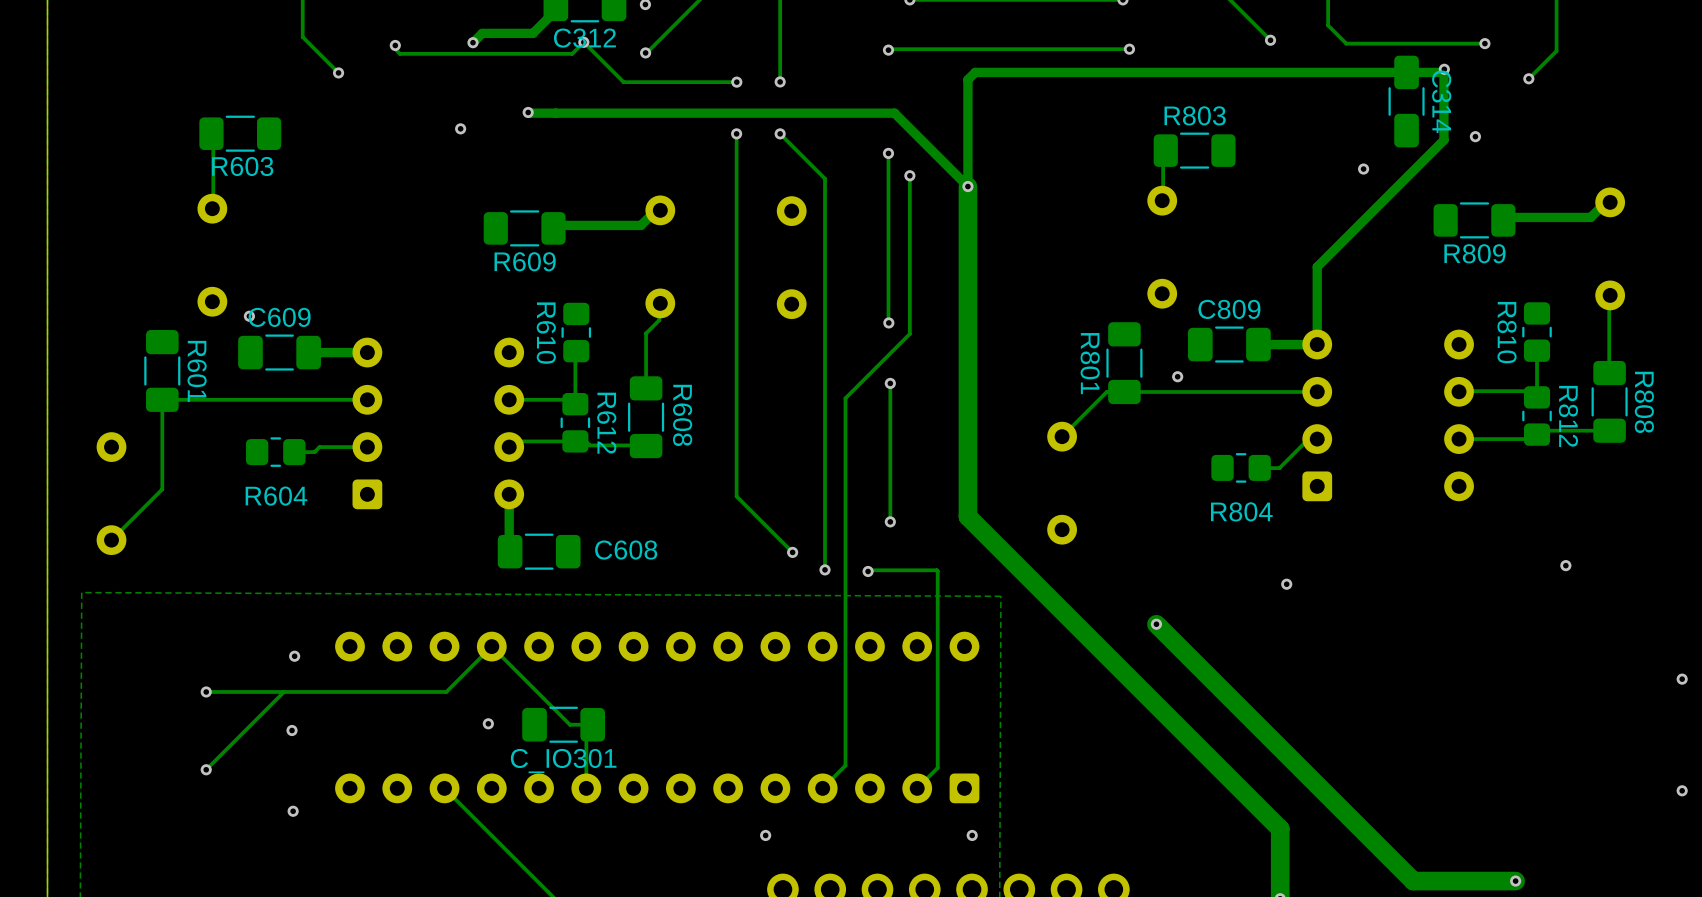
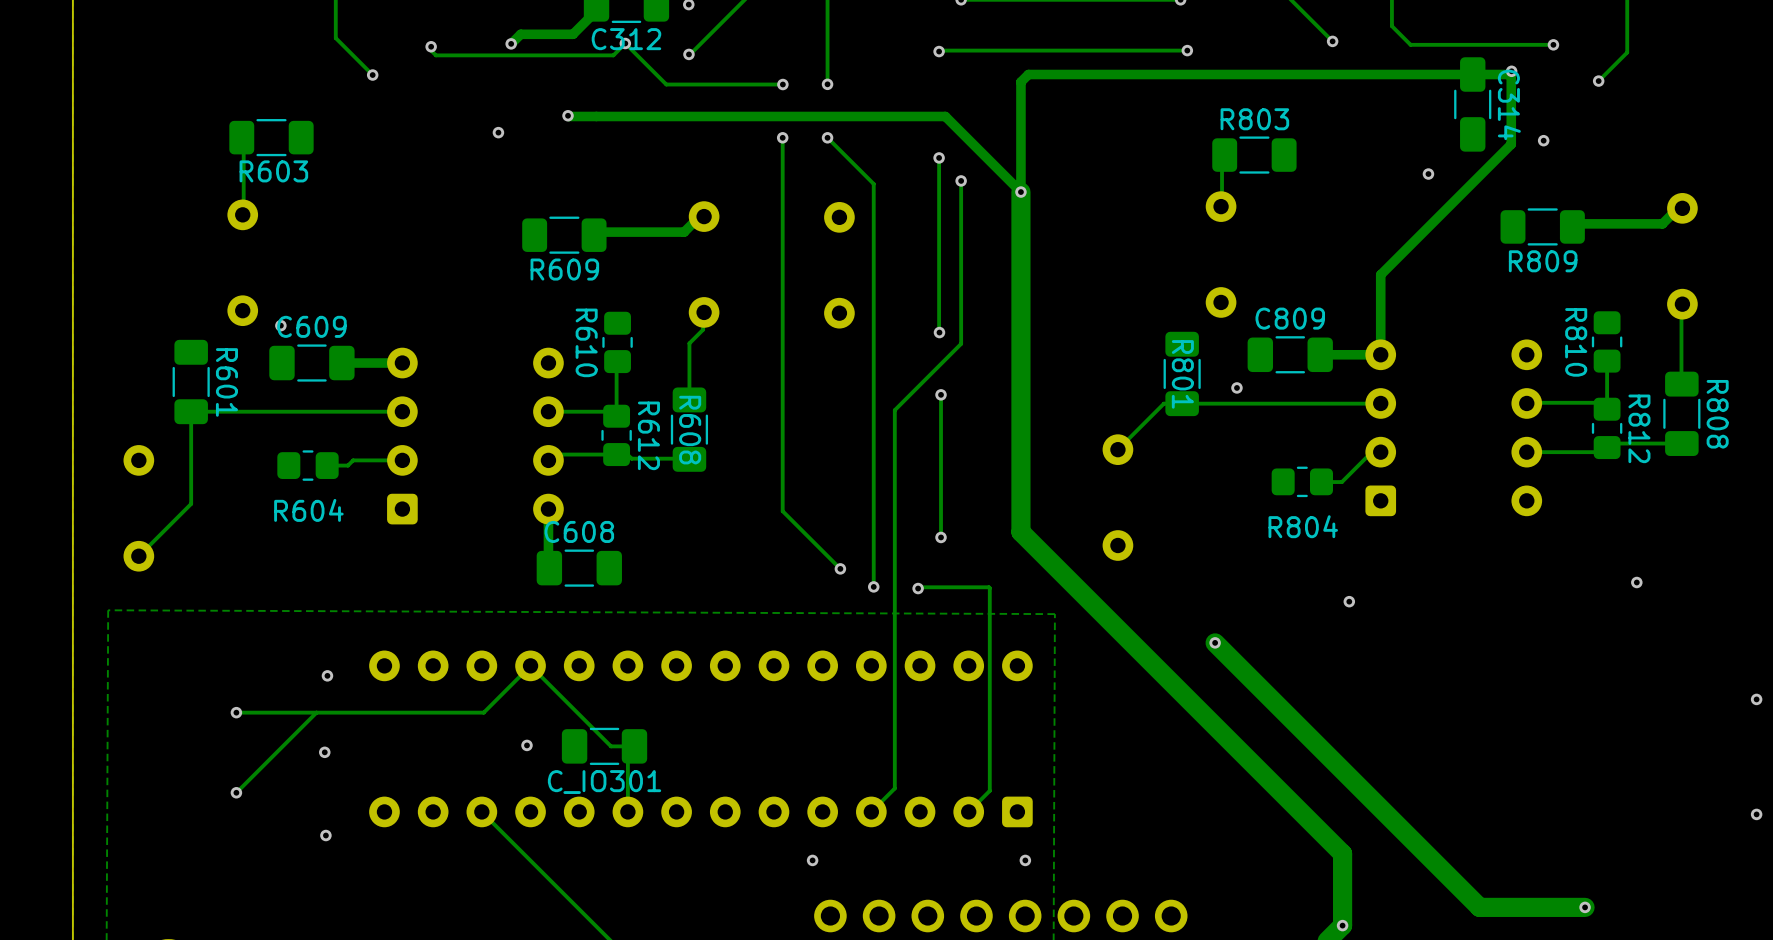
R801 name position: R801 (1090, 363) -> R801 (1182, 374)
R608 name position: R608 (682, 415) -> R608 (690, 430)
C608 name position: C608 (626, 550) -> C608 (579, 531)

